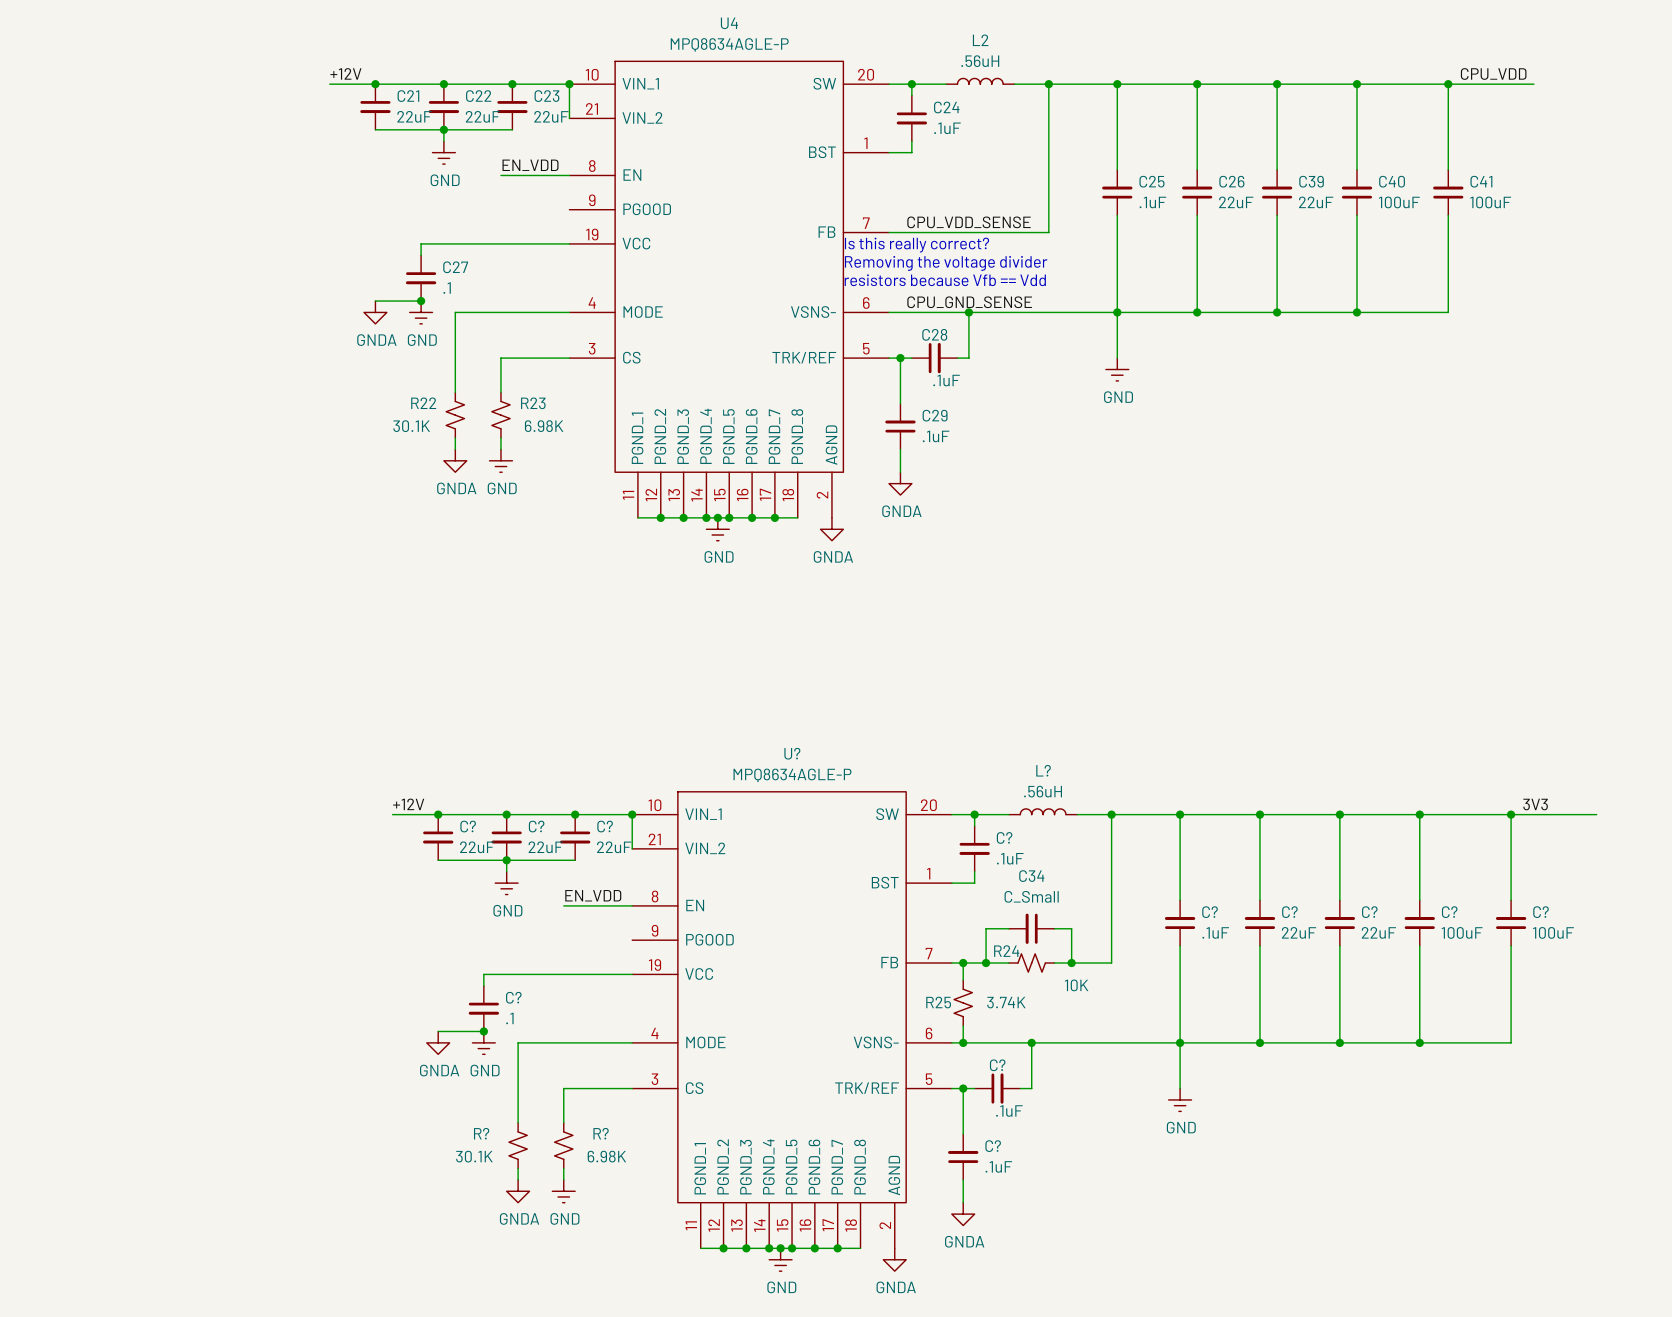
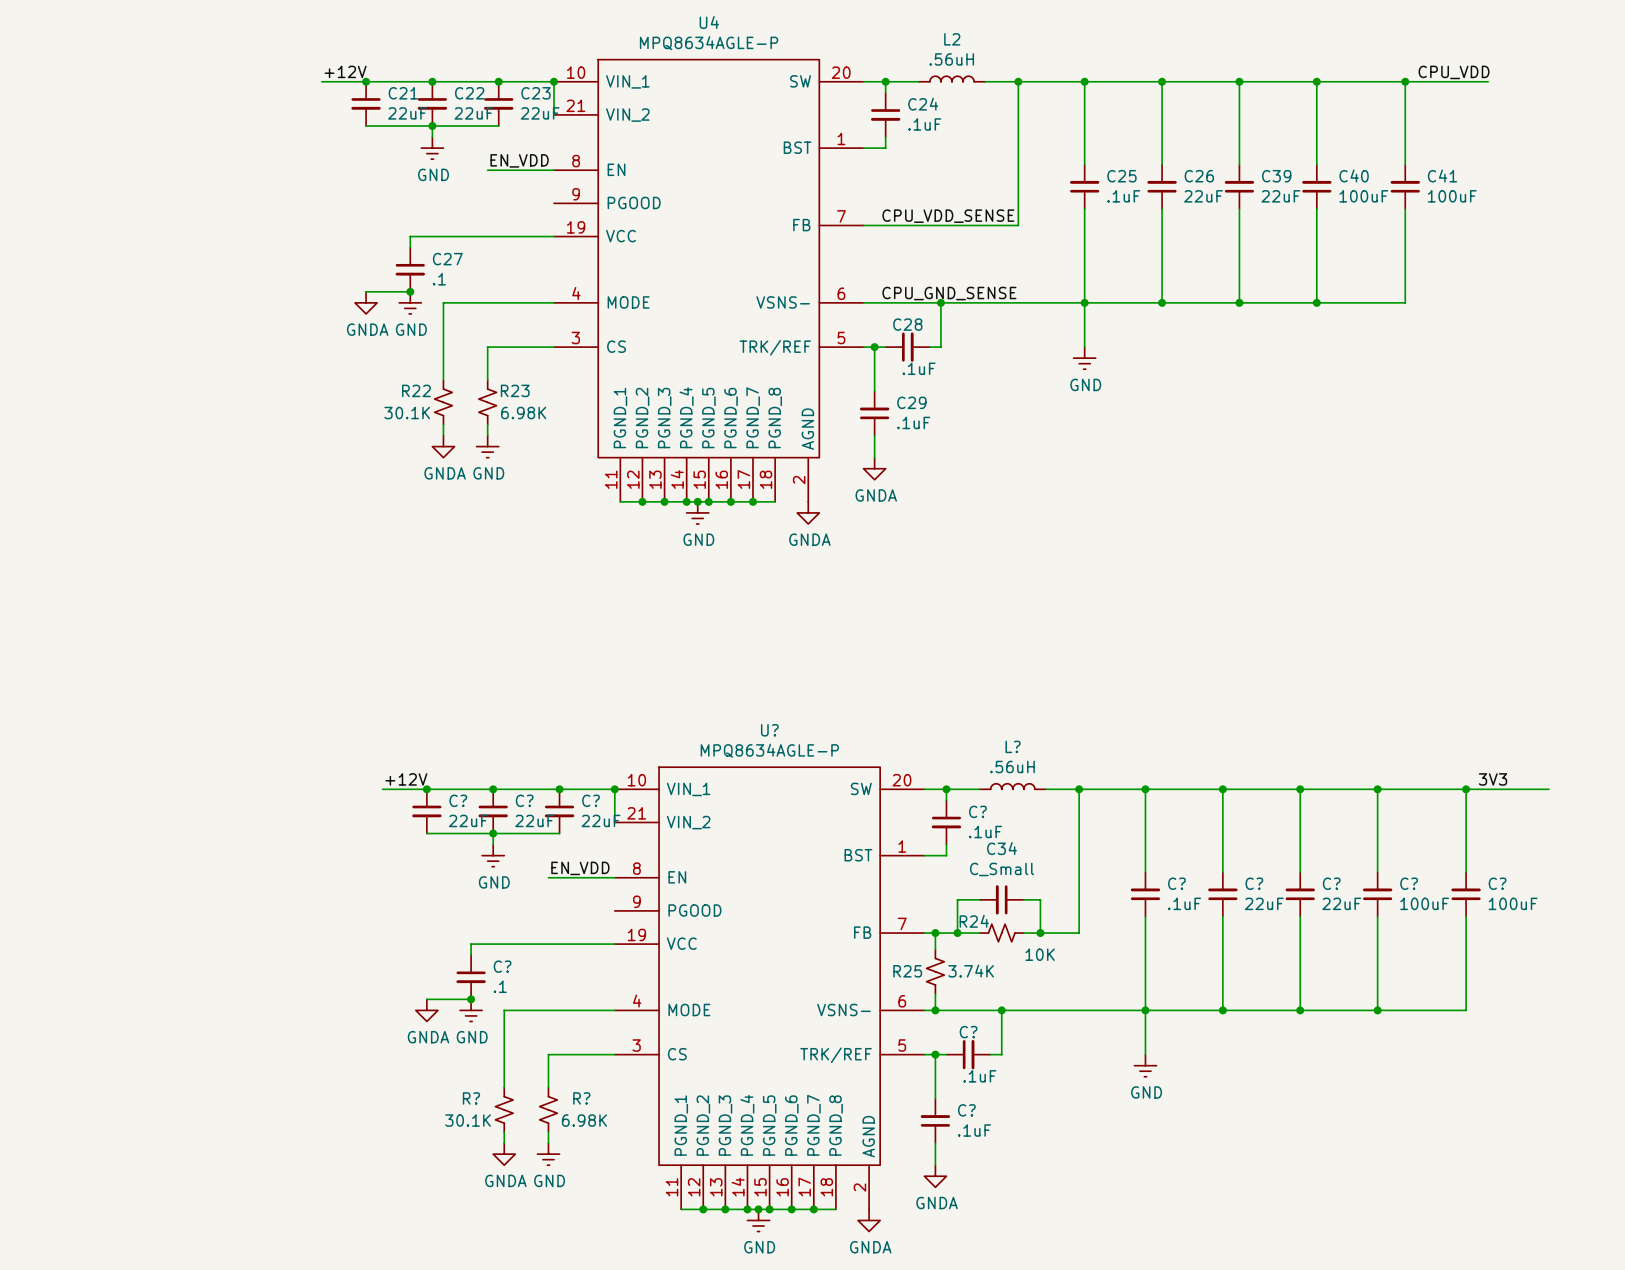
text: Is this really correct? (917, 245) -> none
text: Removing the voltage divider (946, 263) -> none
text: resistors because Vfb == Vdd (945, 280) -> none

